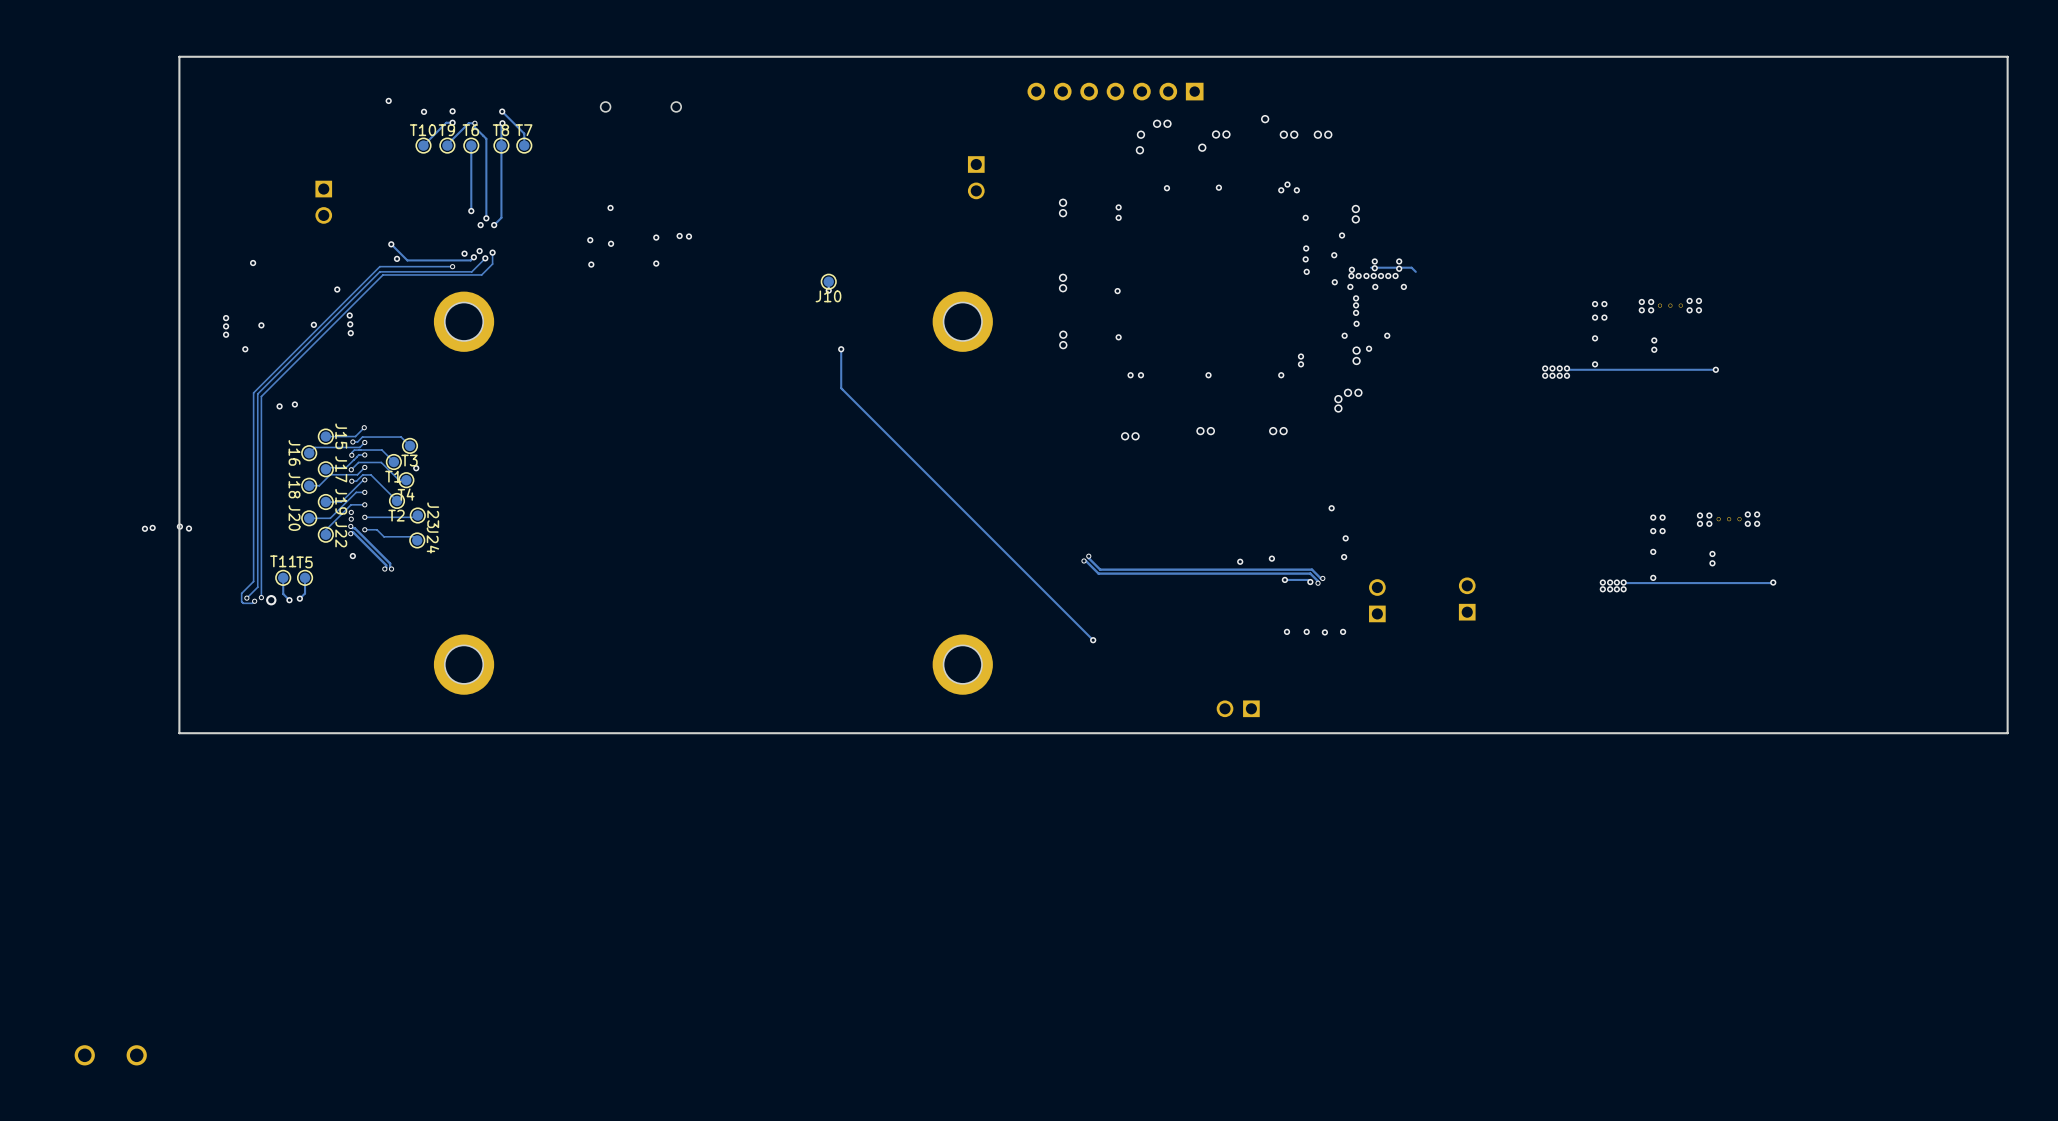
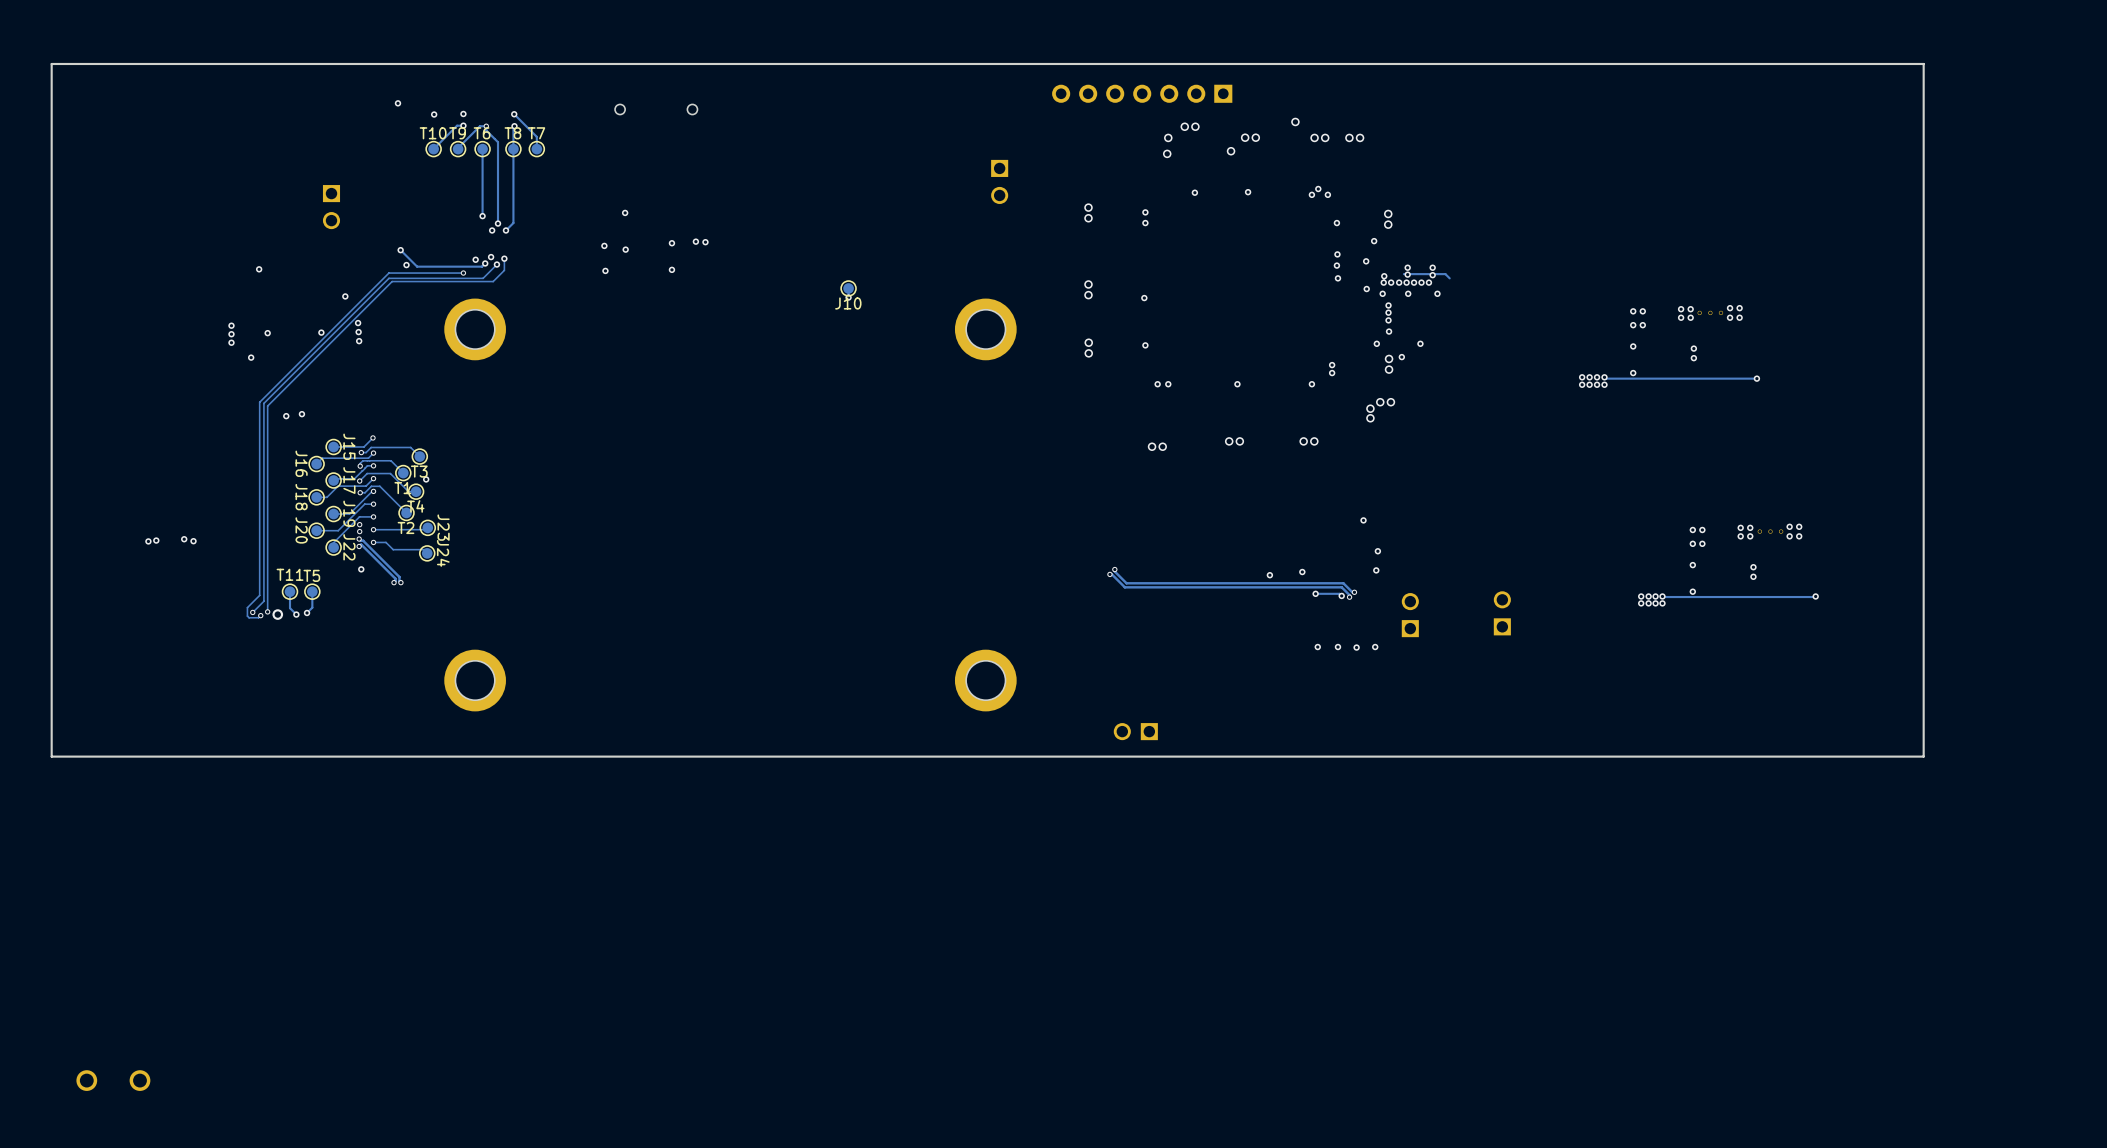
board edge: (2007, 56) (179, 56) (179, 733) (2007, 733) (2007, 56) -> (1923, 63) (1923, 756) (51, 756) (51, 63) (1923, 63)
track: (841, 349) (841, 388) (1093, 640) -> none
via: (841, 349) -> none
via: (1093, 640) -> none
part position: (1238, 708) -> (1135, 731)

